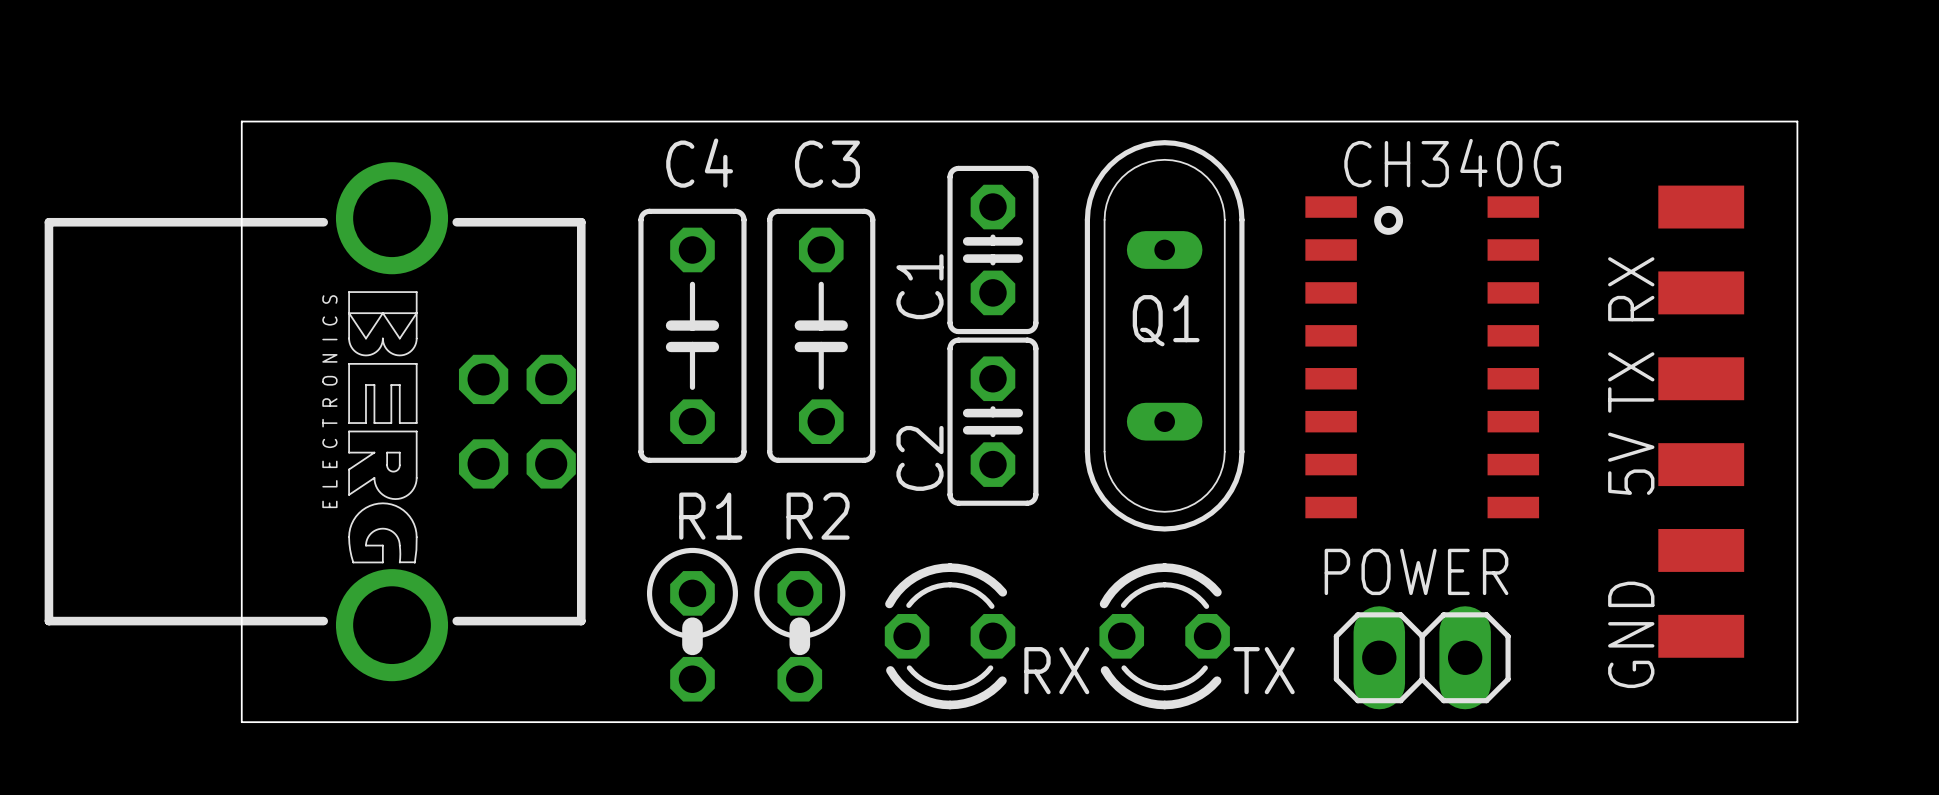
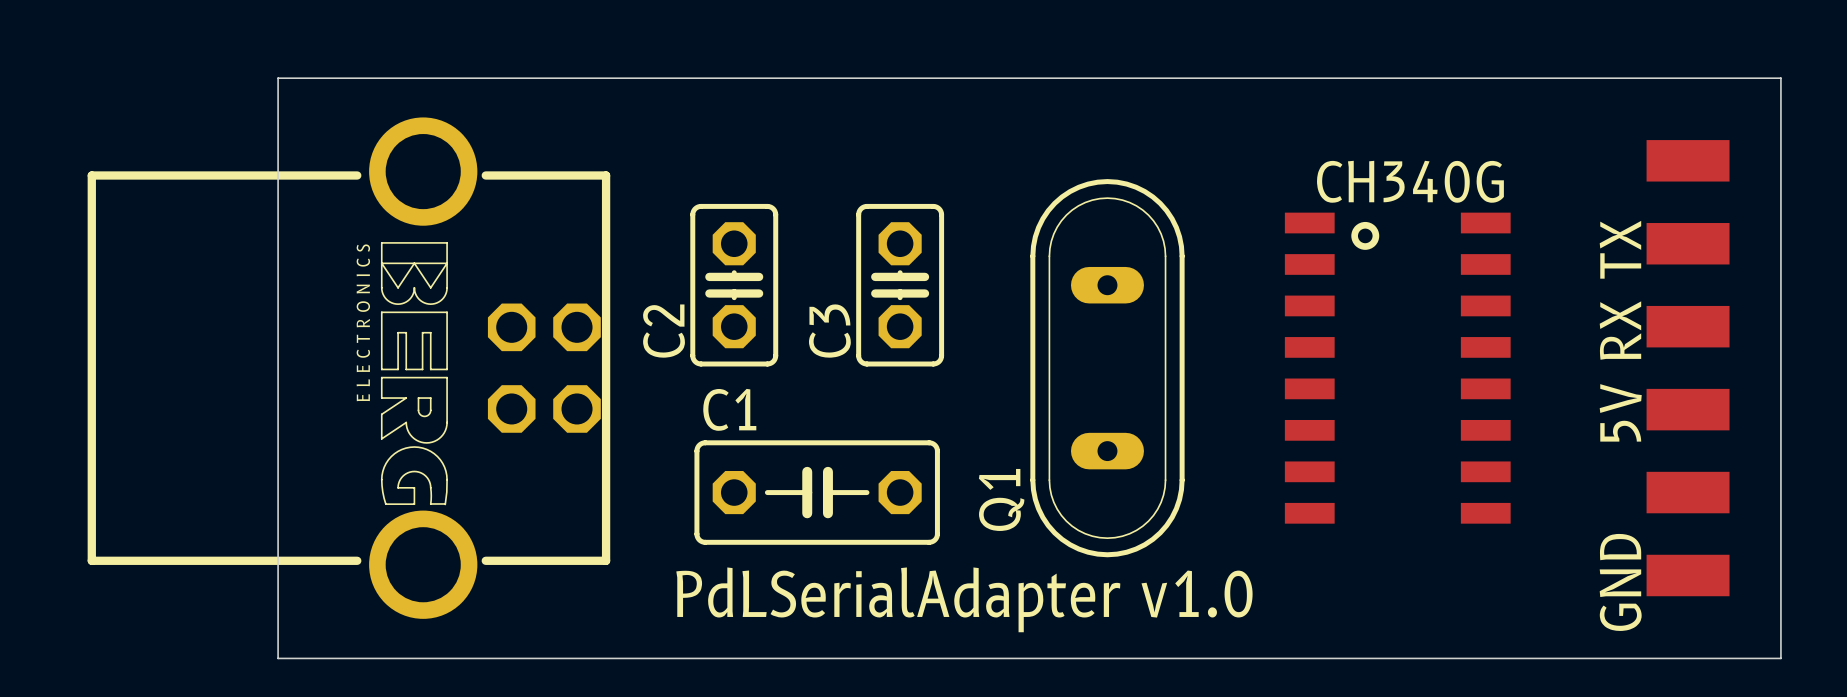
C3 name position: C3 (827, 164) -> C3 (829, 331)
C1 footprint: [947, 165, 1039, 335] -> [694, 440, 940, 545]
C3 footprint: [767, 208, 876, 463] -> [856, 203, 945, 367]
C1 name position: C1 (919, 286) -> C1 (729, 409)
RX name: RX (1631, 289) -> TX (1620, 249)
Q1 name rotation: 0° (1166, 320) -> 90° counterclockwise (1001, 499)
Q1 name position: Q1 (1166, 320) -> Q1 (1001, 499)
C4: (692, 335) -> none
Q1 position: (1164, 335) -> (1107, 368)
part position: (1422, 357) -> (1397, 368)
TX name: TX (1631, 382) -> RX (1620, 330)
C2 position: (992, 421) -> (734, 285)
R1: (692, 624) -> none
R2: (799, 624) -> none
part: RX (950, 636) -> none
part: TX (1164, 636) -> none
part: POWER (1422, 657) -> none
text: none -> PdLSerialAdapter v1.0 (964, 599)

